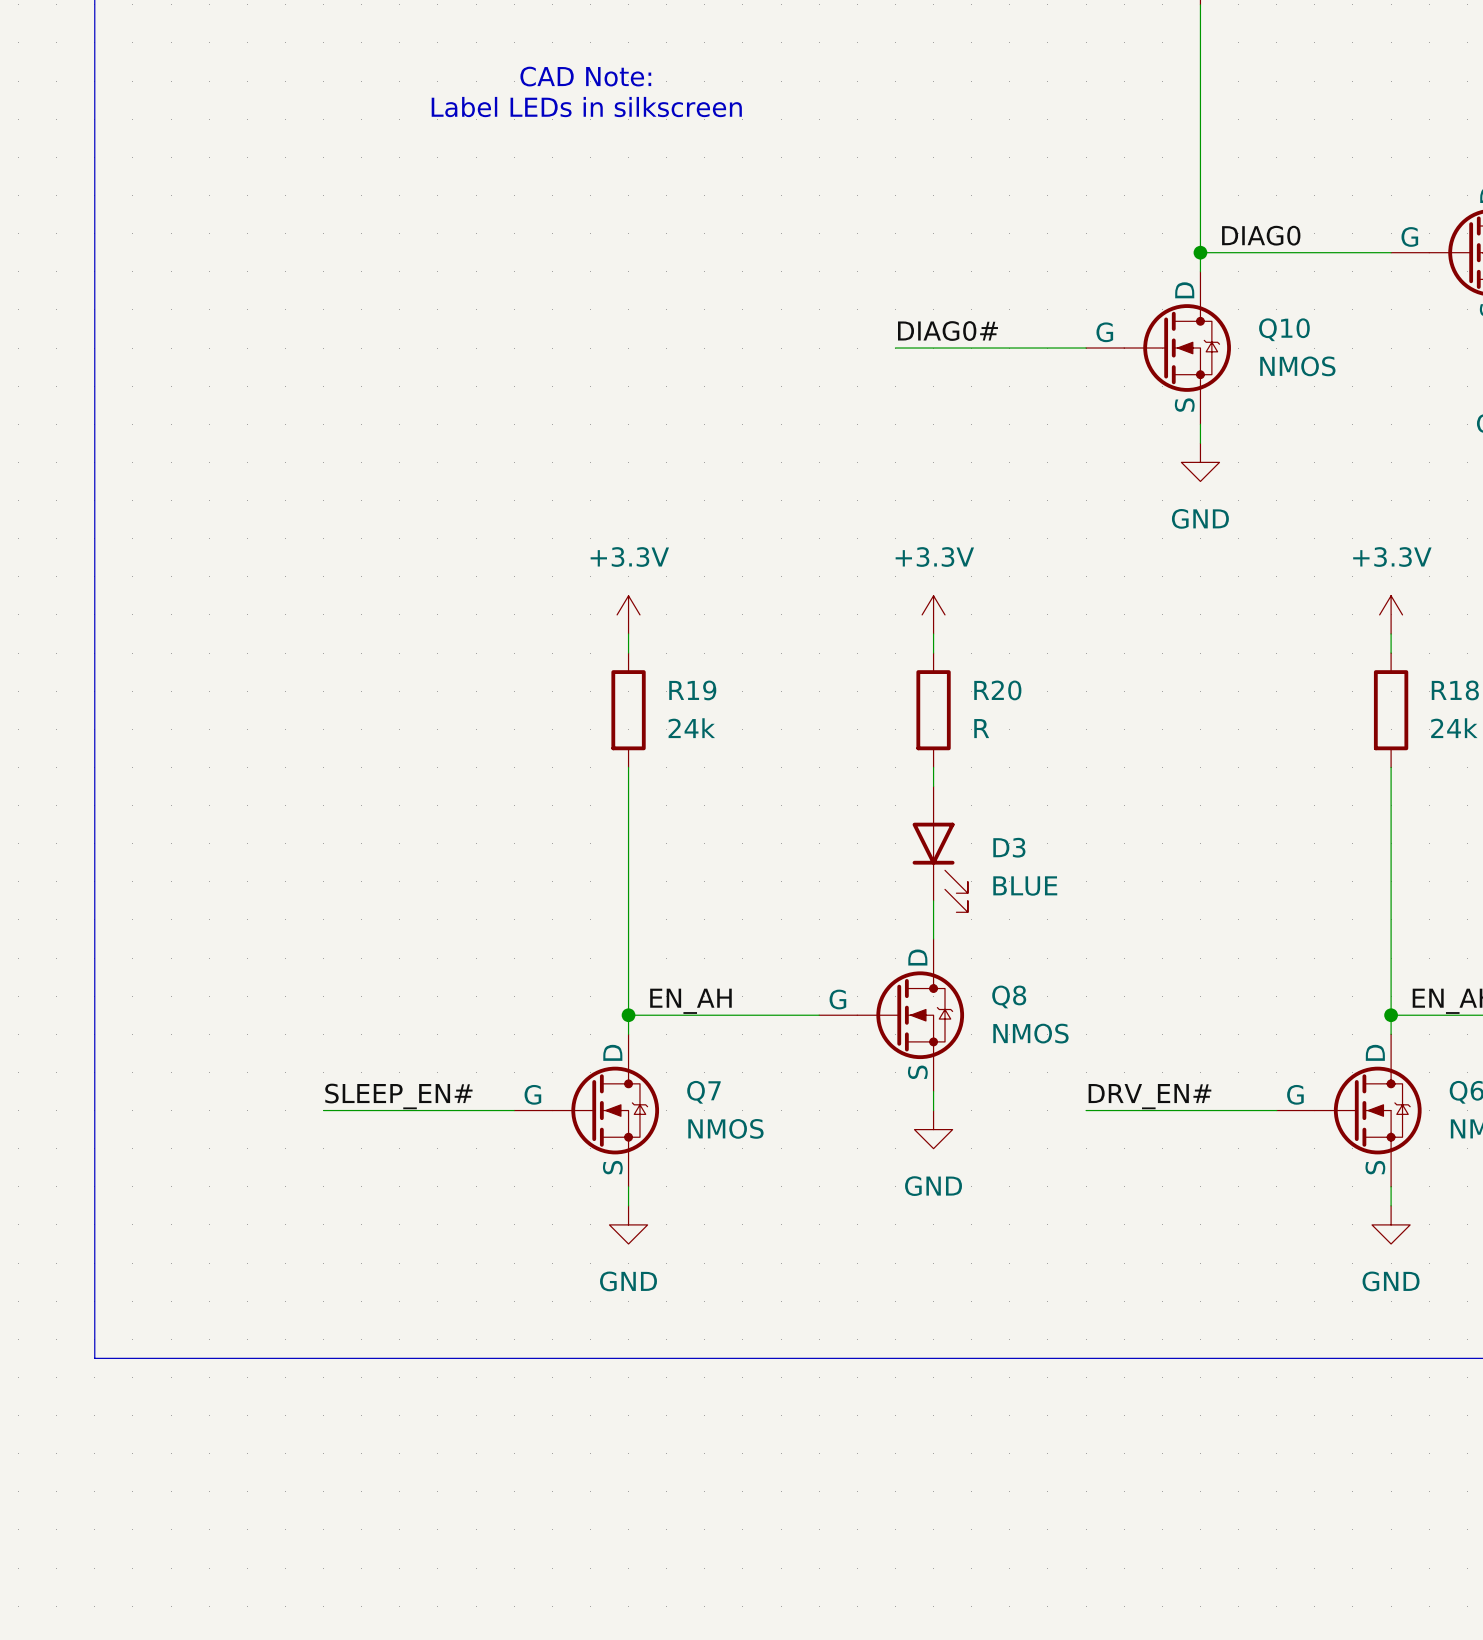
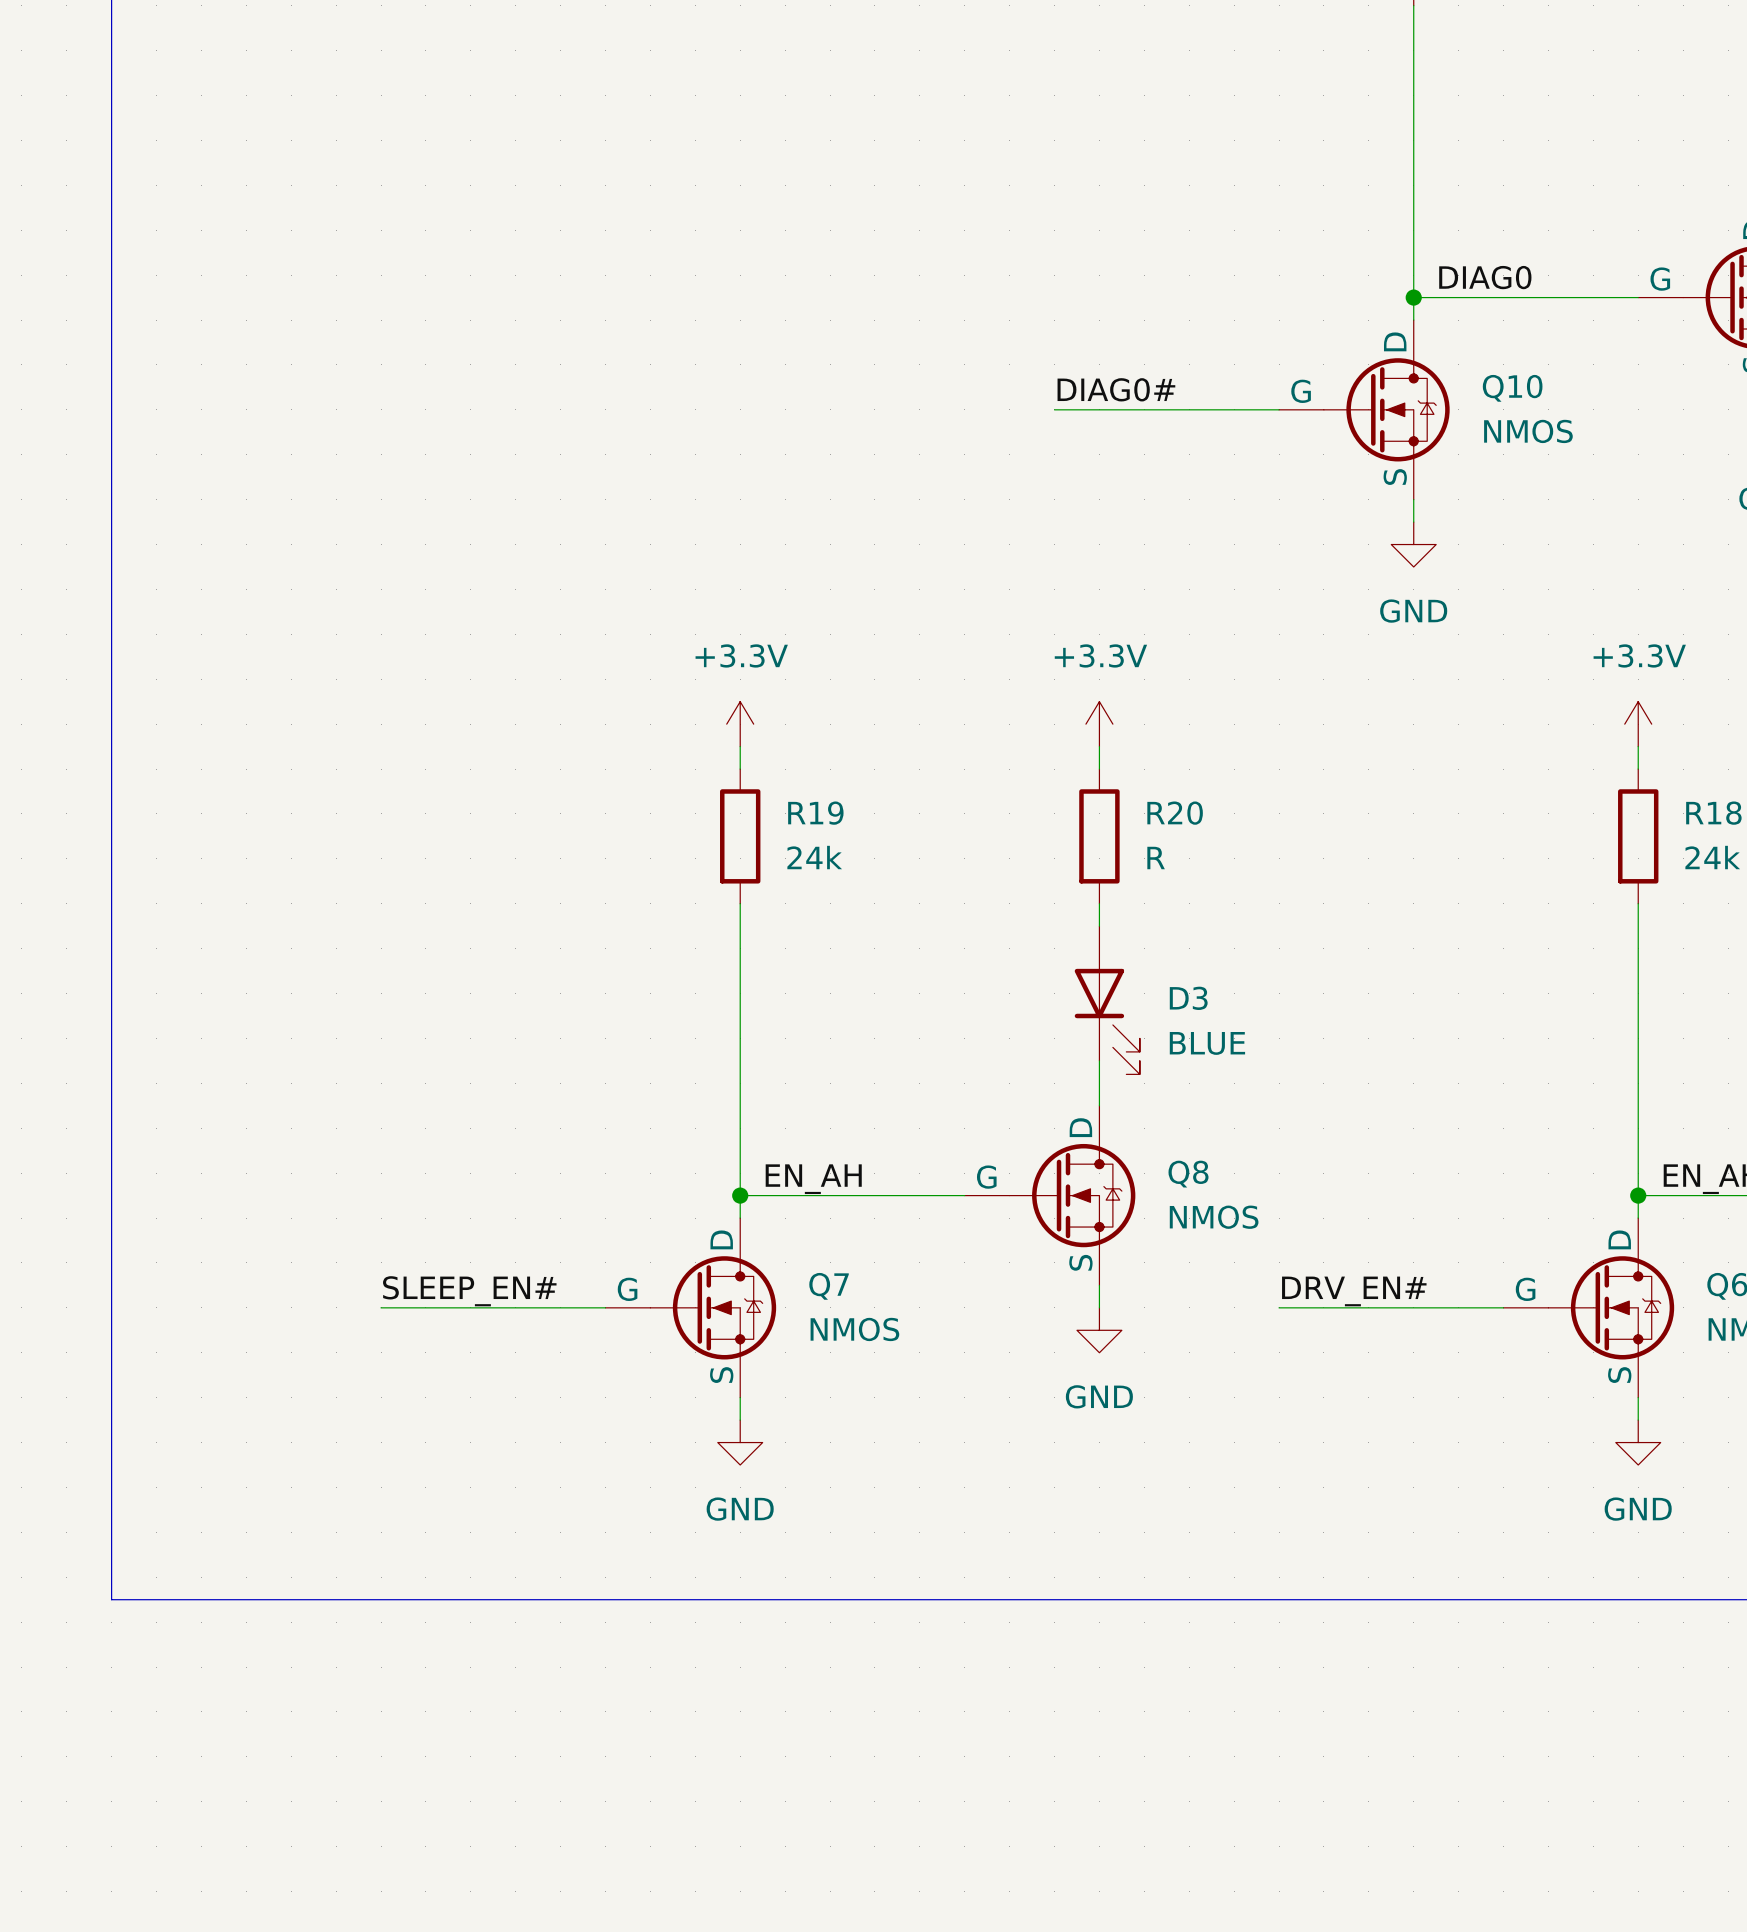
text: CAD Note: (585, 76) -> none
text: Label LEDs in silkscreen (586, 107) -> none

